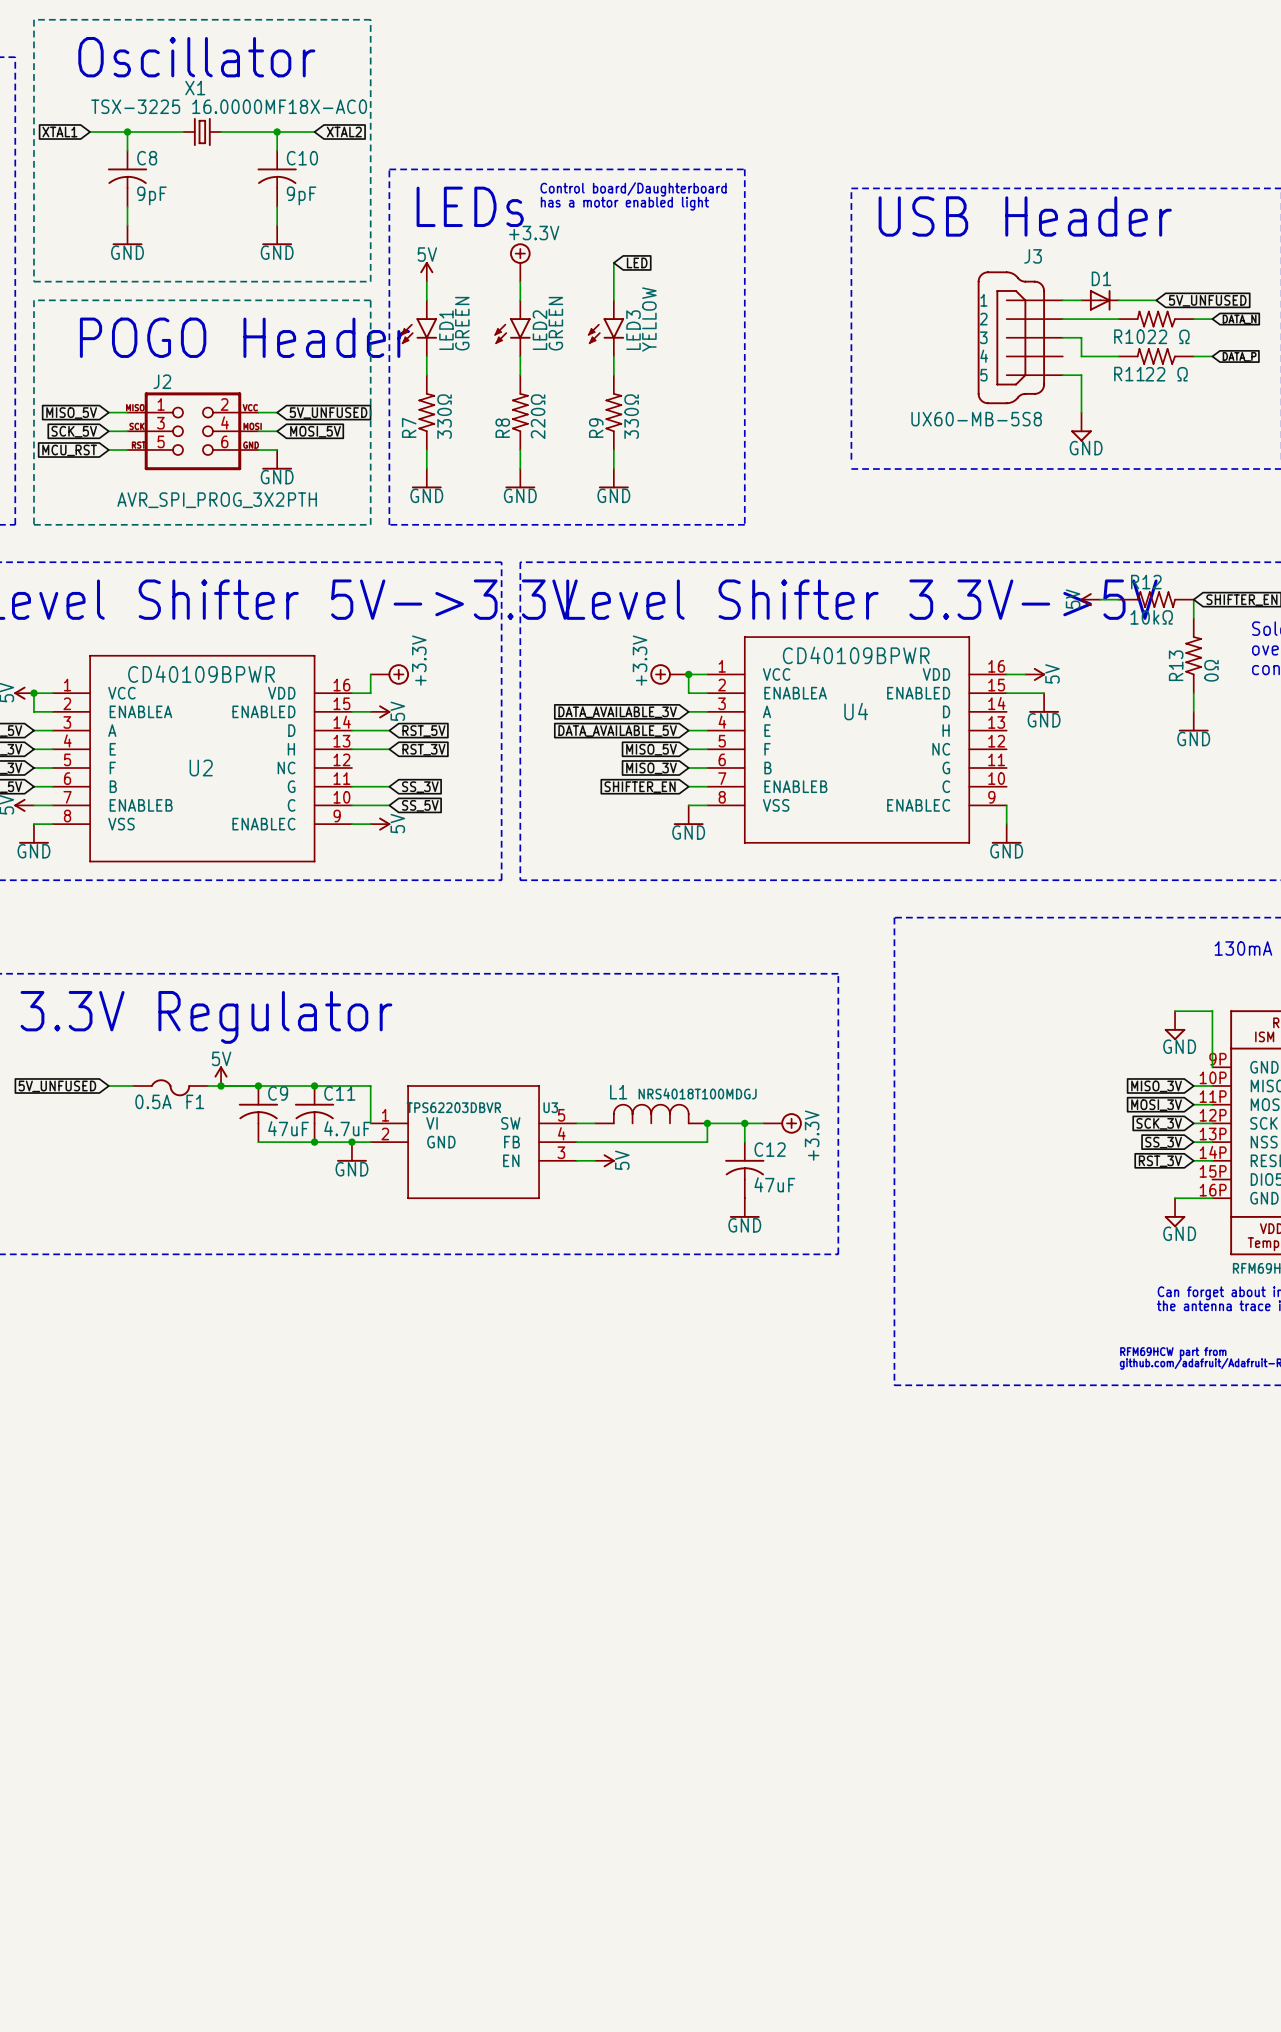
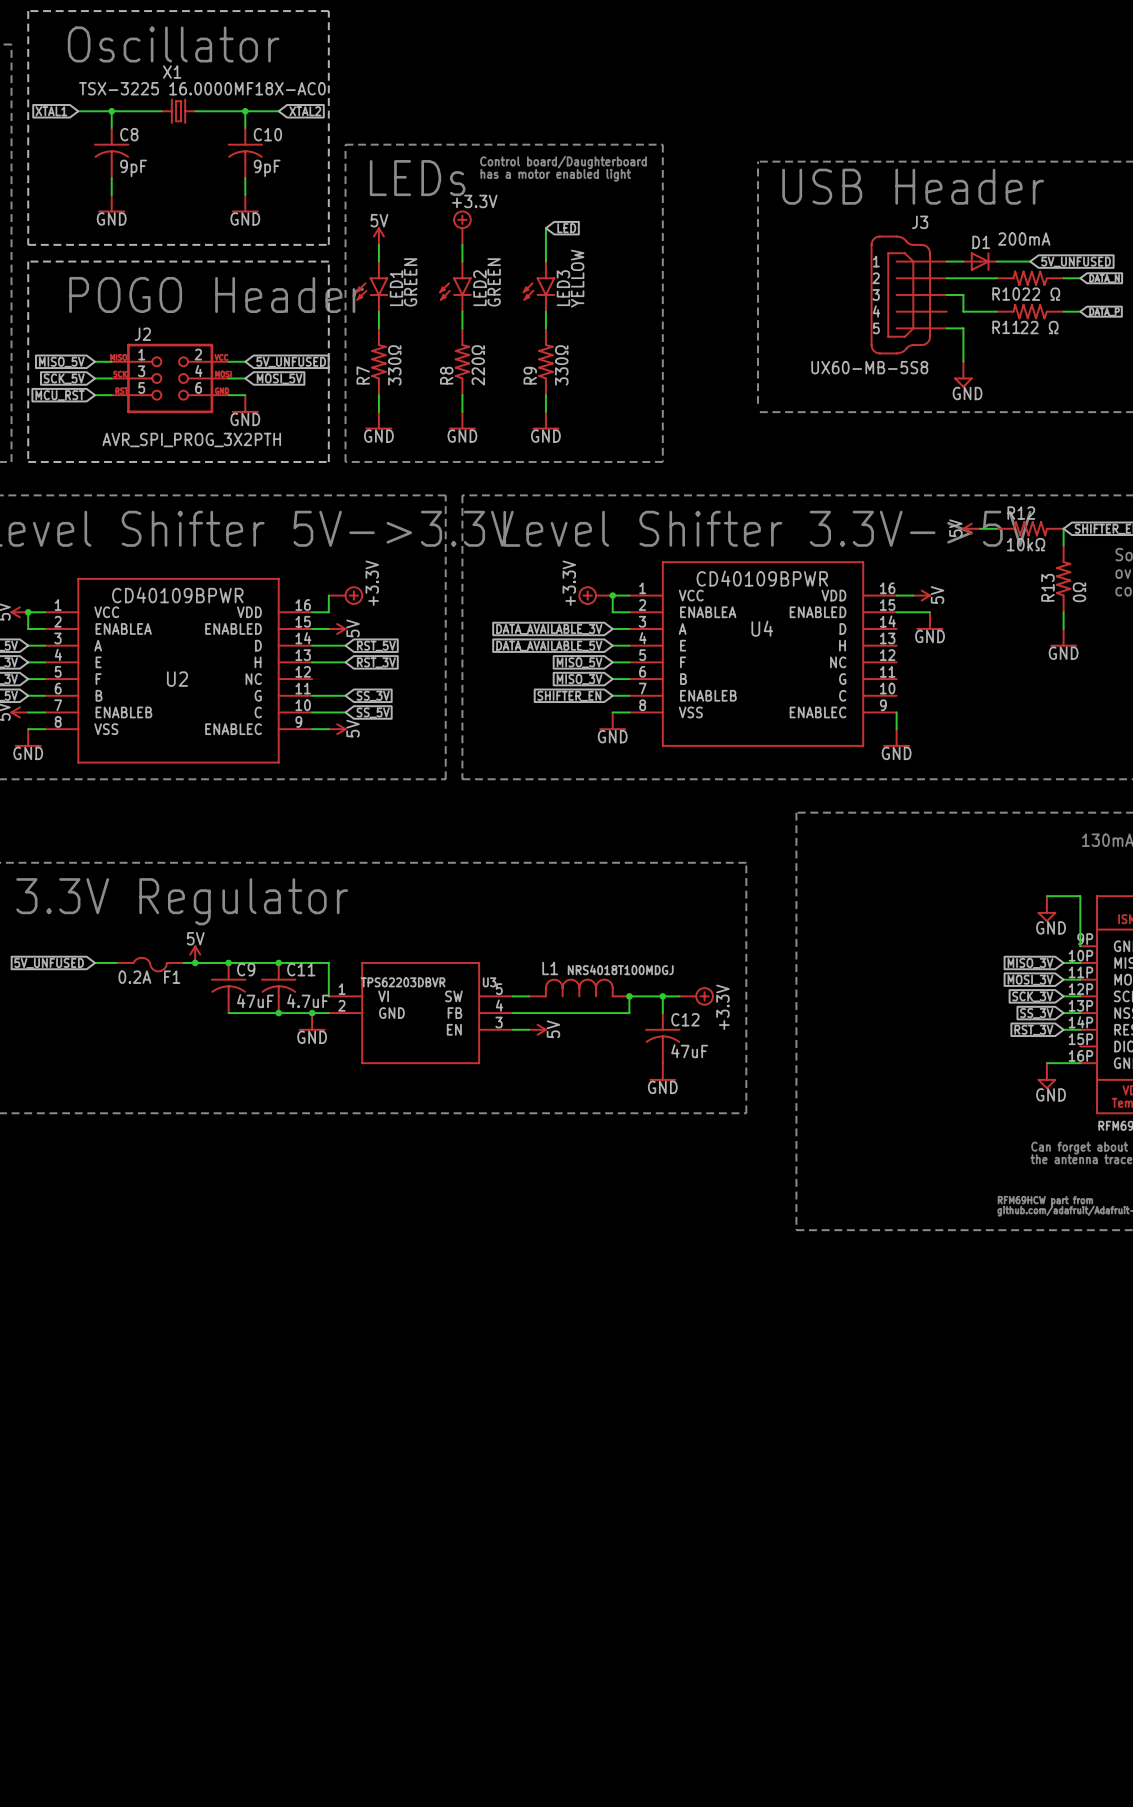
D1 value: none -> 200mA (1024, 239)
F1 value: 0.5A (153, 1101) -> 0.2A (134, 977)

